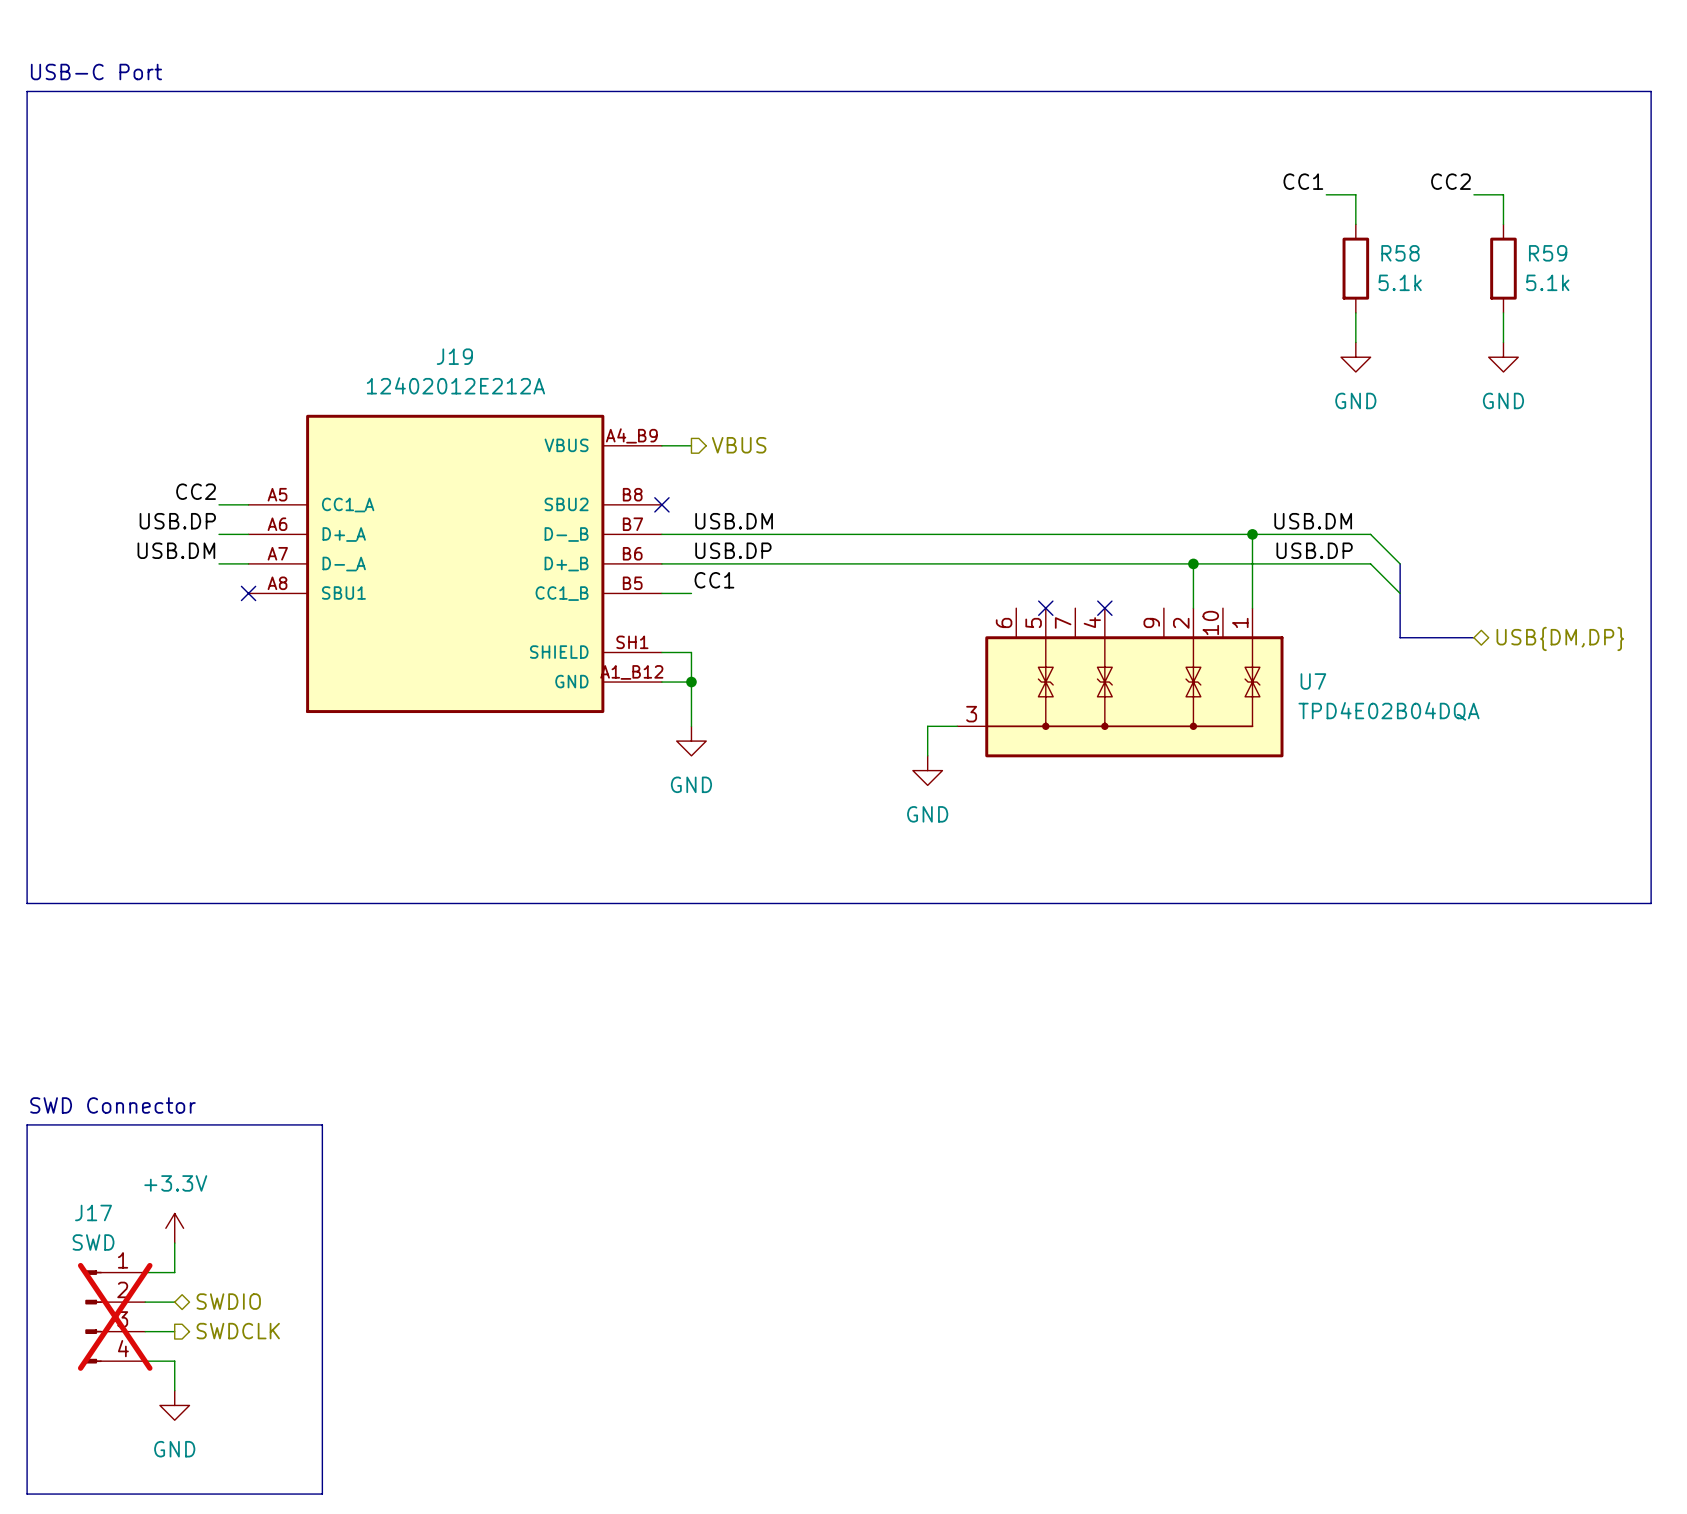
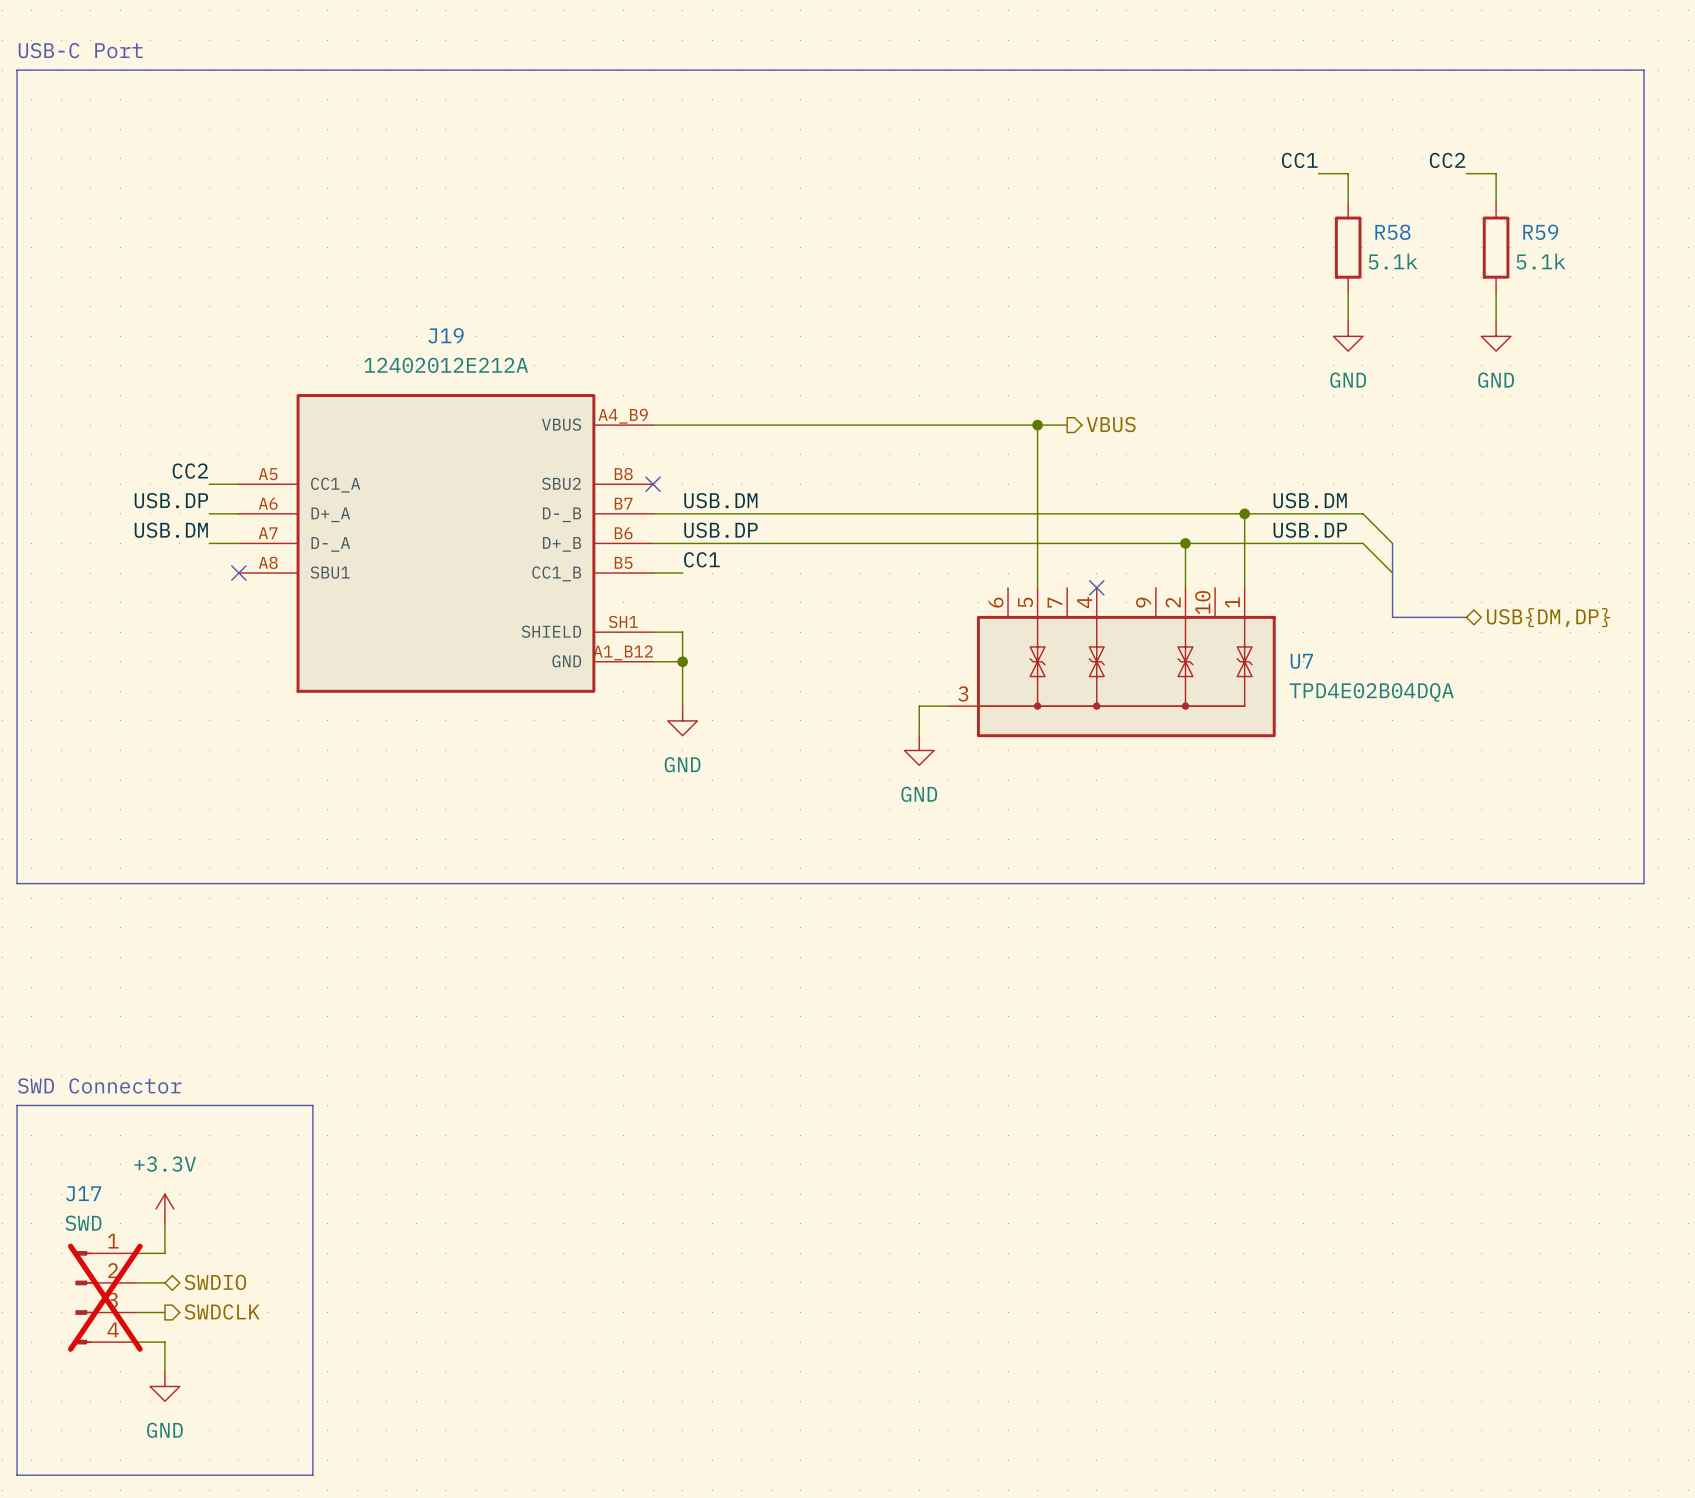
wire: none -> (682, 425) (1067, 425)
hierarchical label: VBUS (739, 445) -> none
wire: none -> (1037, 425) (1037, 587)
junction: none -> (1037, 425)
hierarchical label: none -> VBUS (1111, 424)
no-connect mark: (1045, 608) -> none

